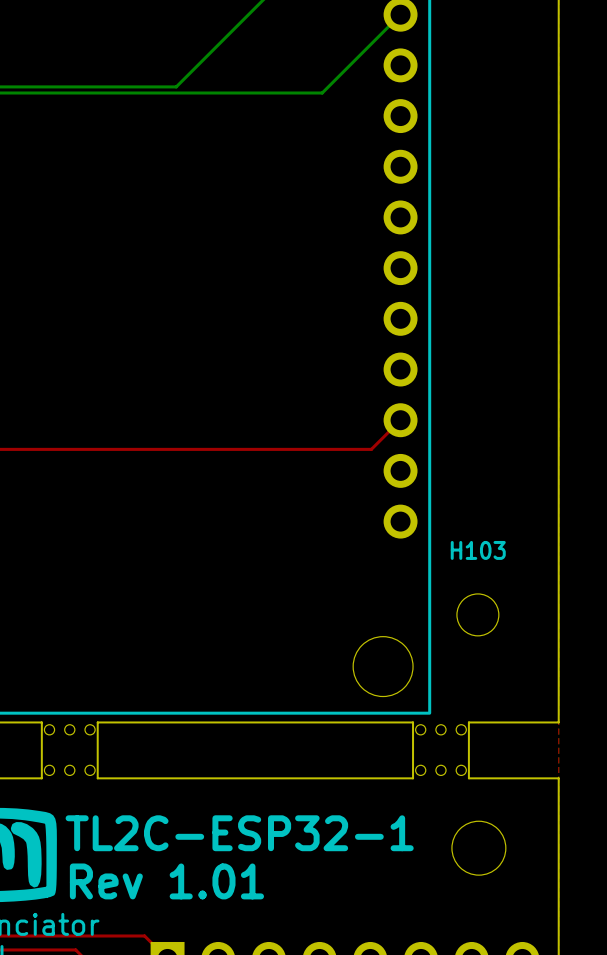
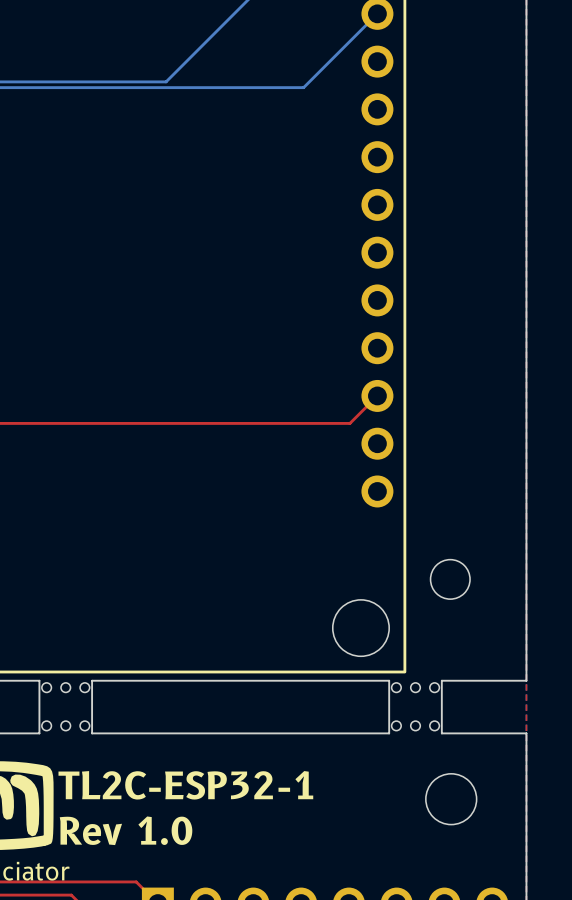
H103 name: H103 (478, 550) -> none
text: Rev 1.01 (166, 881) -> Rev 1.0 (126, 830)

